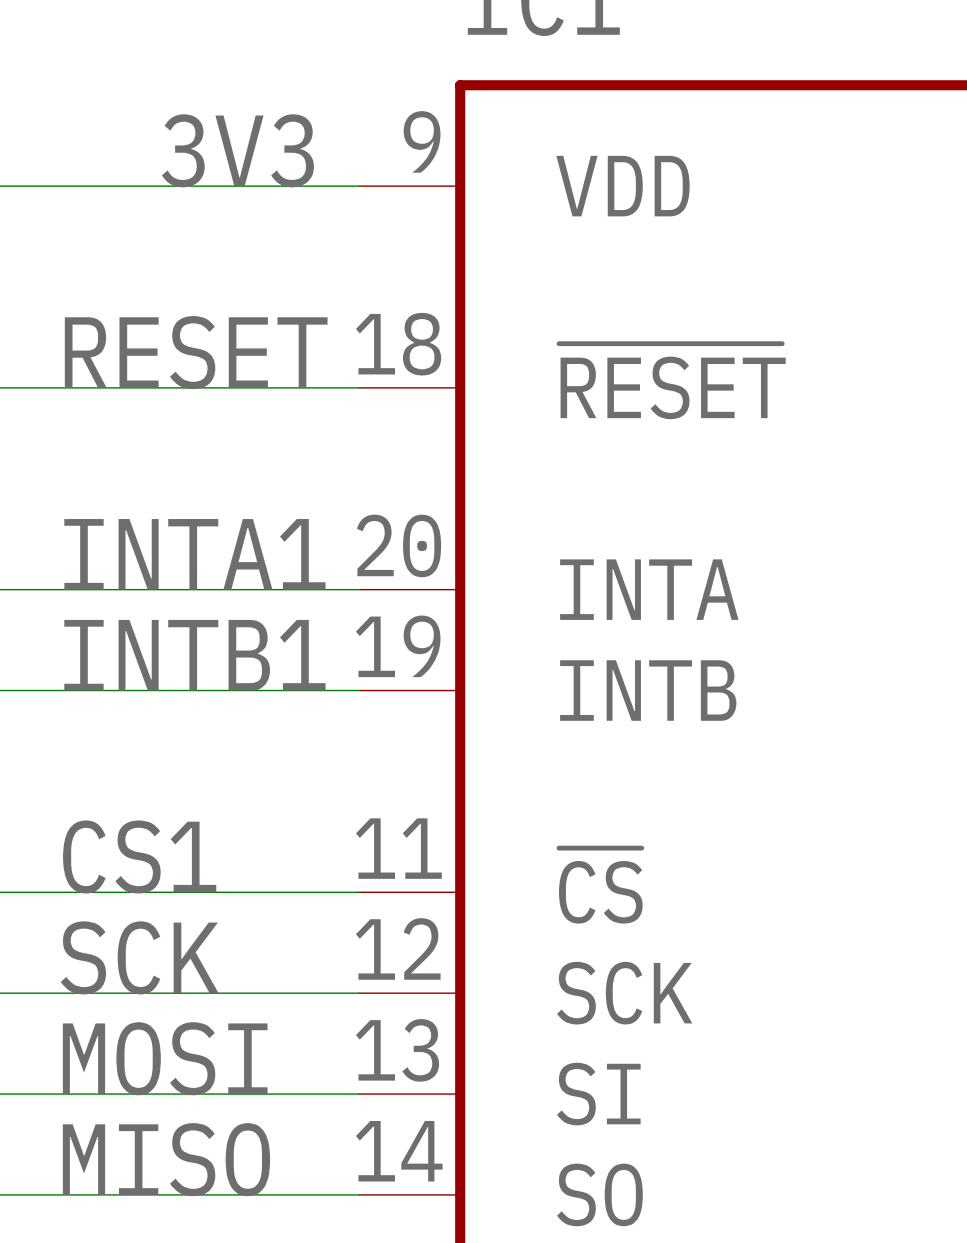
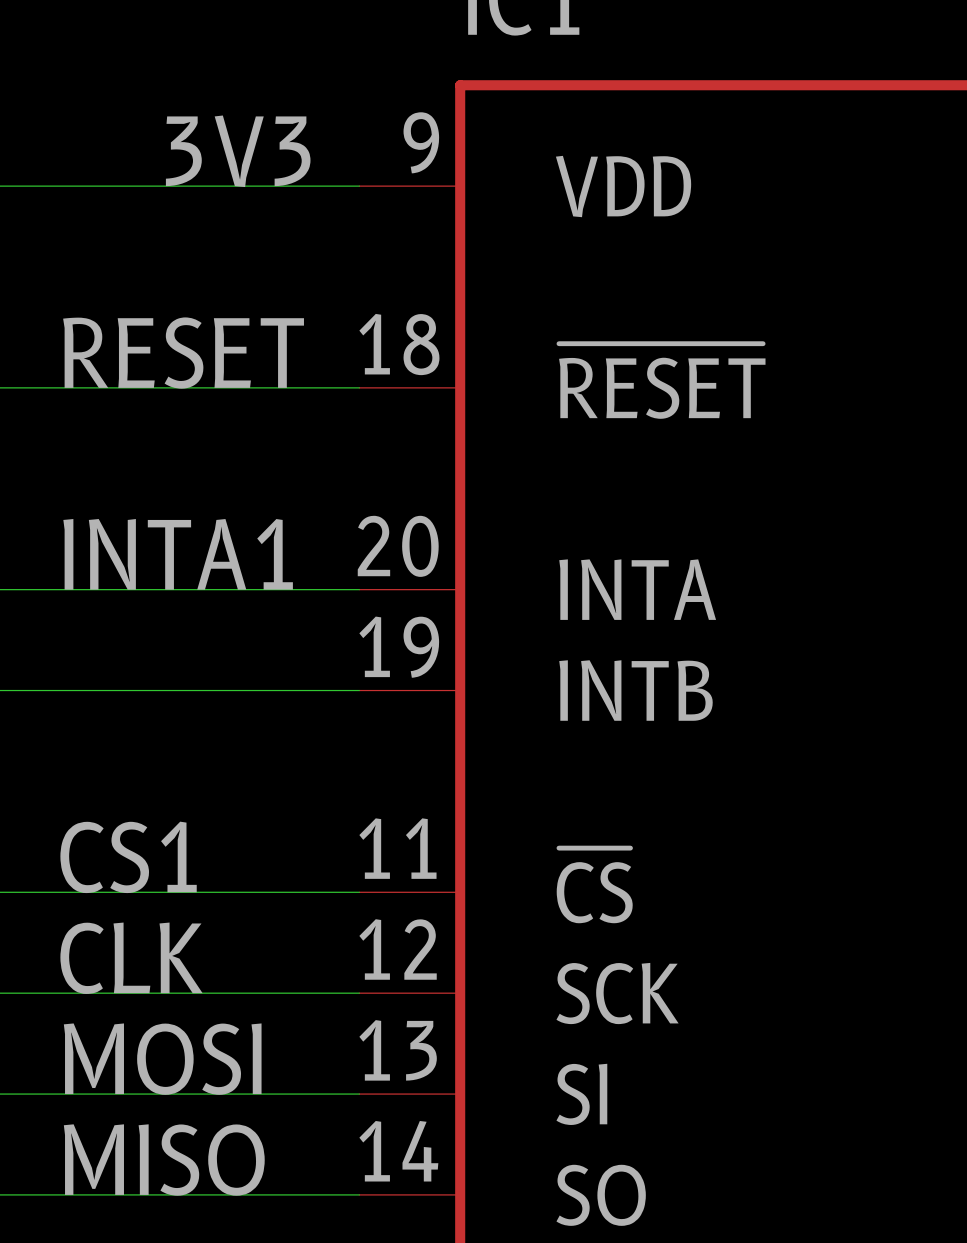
label: INTB1 (194, 655) -> none
label: SCK (139, 957) -> CLK (131, 958)

